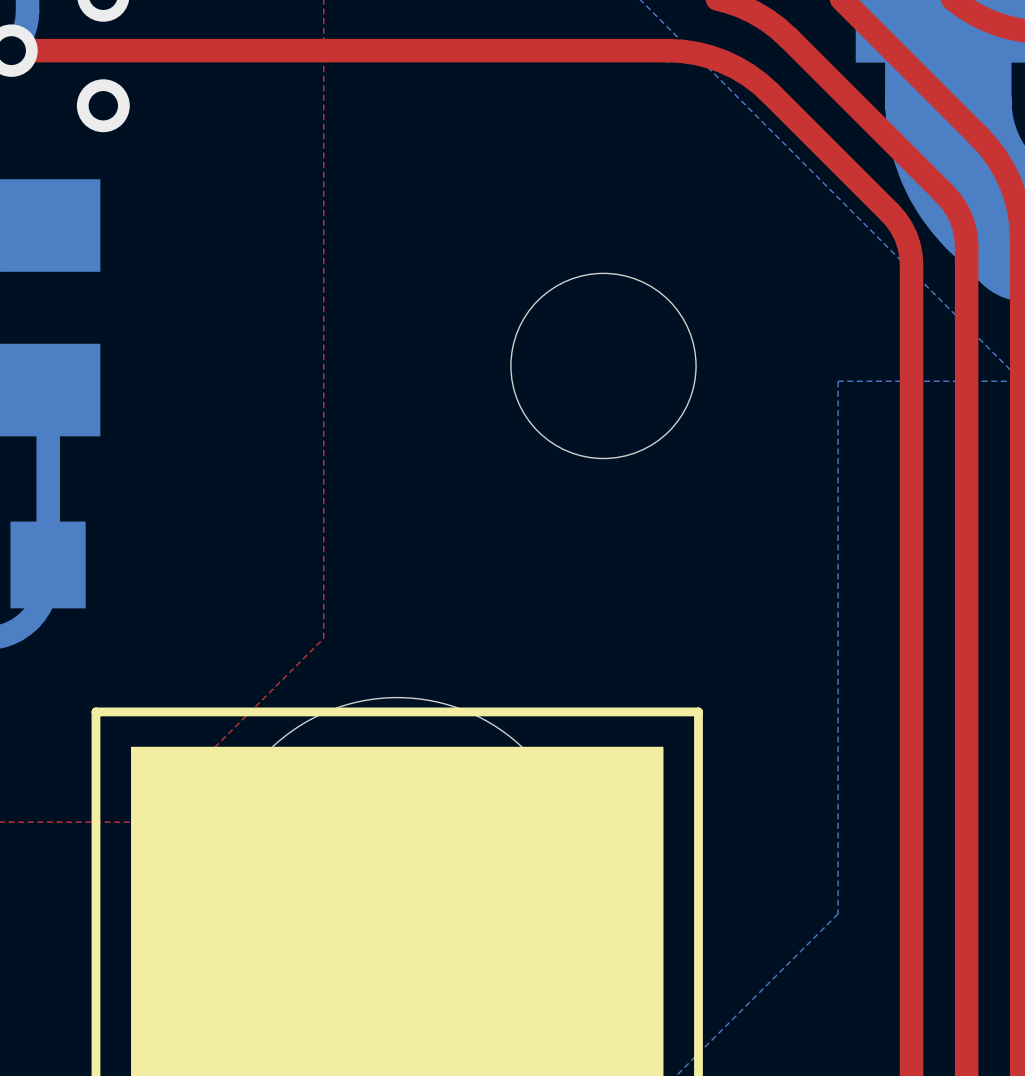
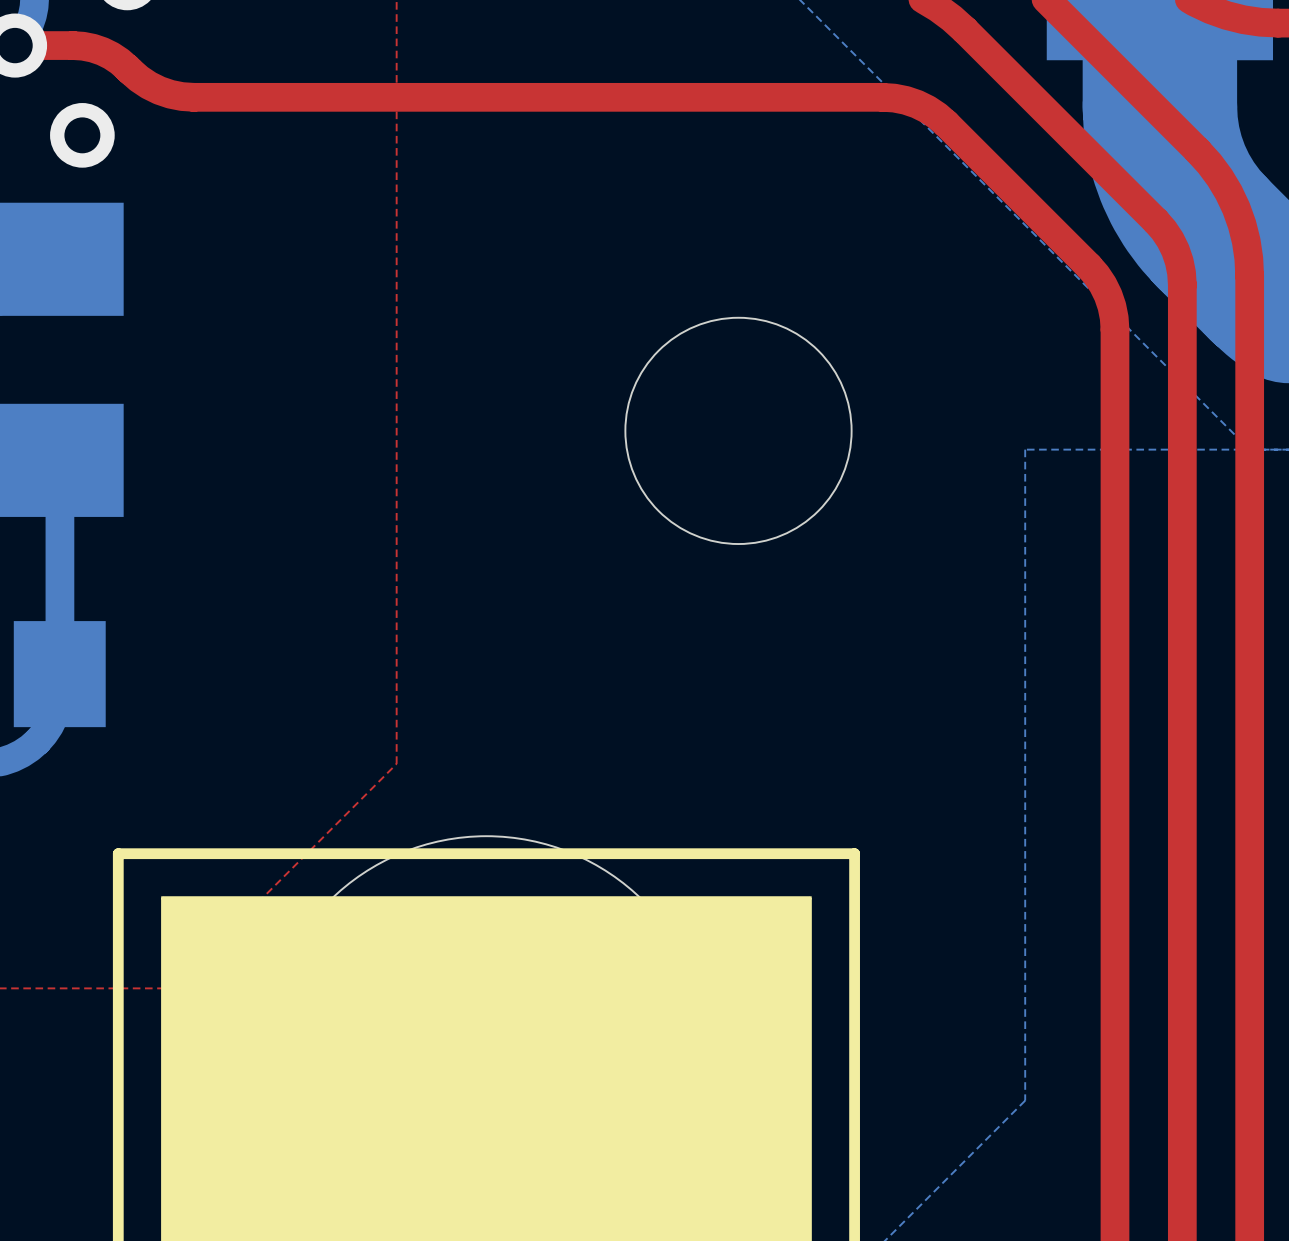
top track: (58, 50) (667, 50) (709, 56) (736, 67) (759, 83) (890, 212) (901, 228) (909, 245) (911, 283) -> (73, 45) (102, 51) (119, 61) (148, 85) (159, 90) (182, 96) (882, 97) (905, 100) (927, 109) (946, 123) (1088, 266) (1096, 275) (1108, 295) (1114, 317) (1114, 329)
via position: (103, 105) -> (82, 135)

